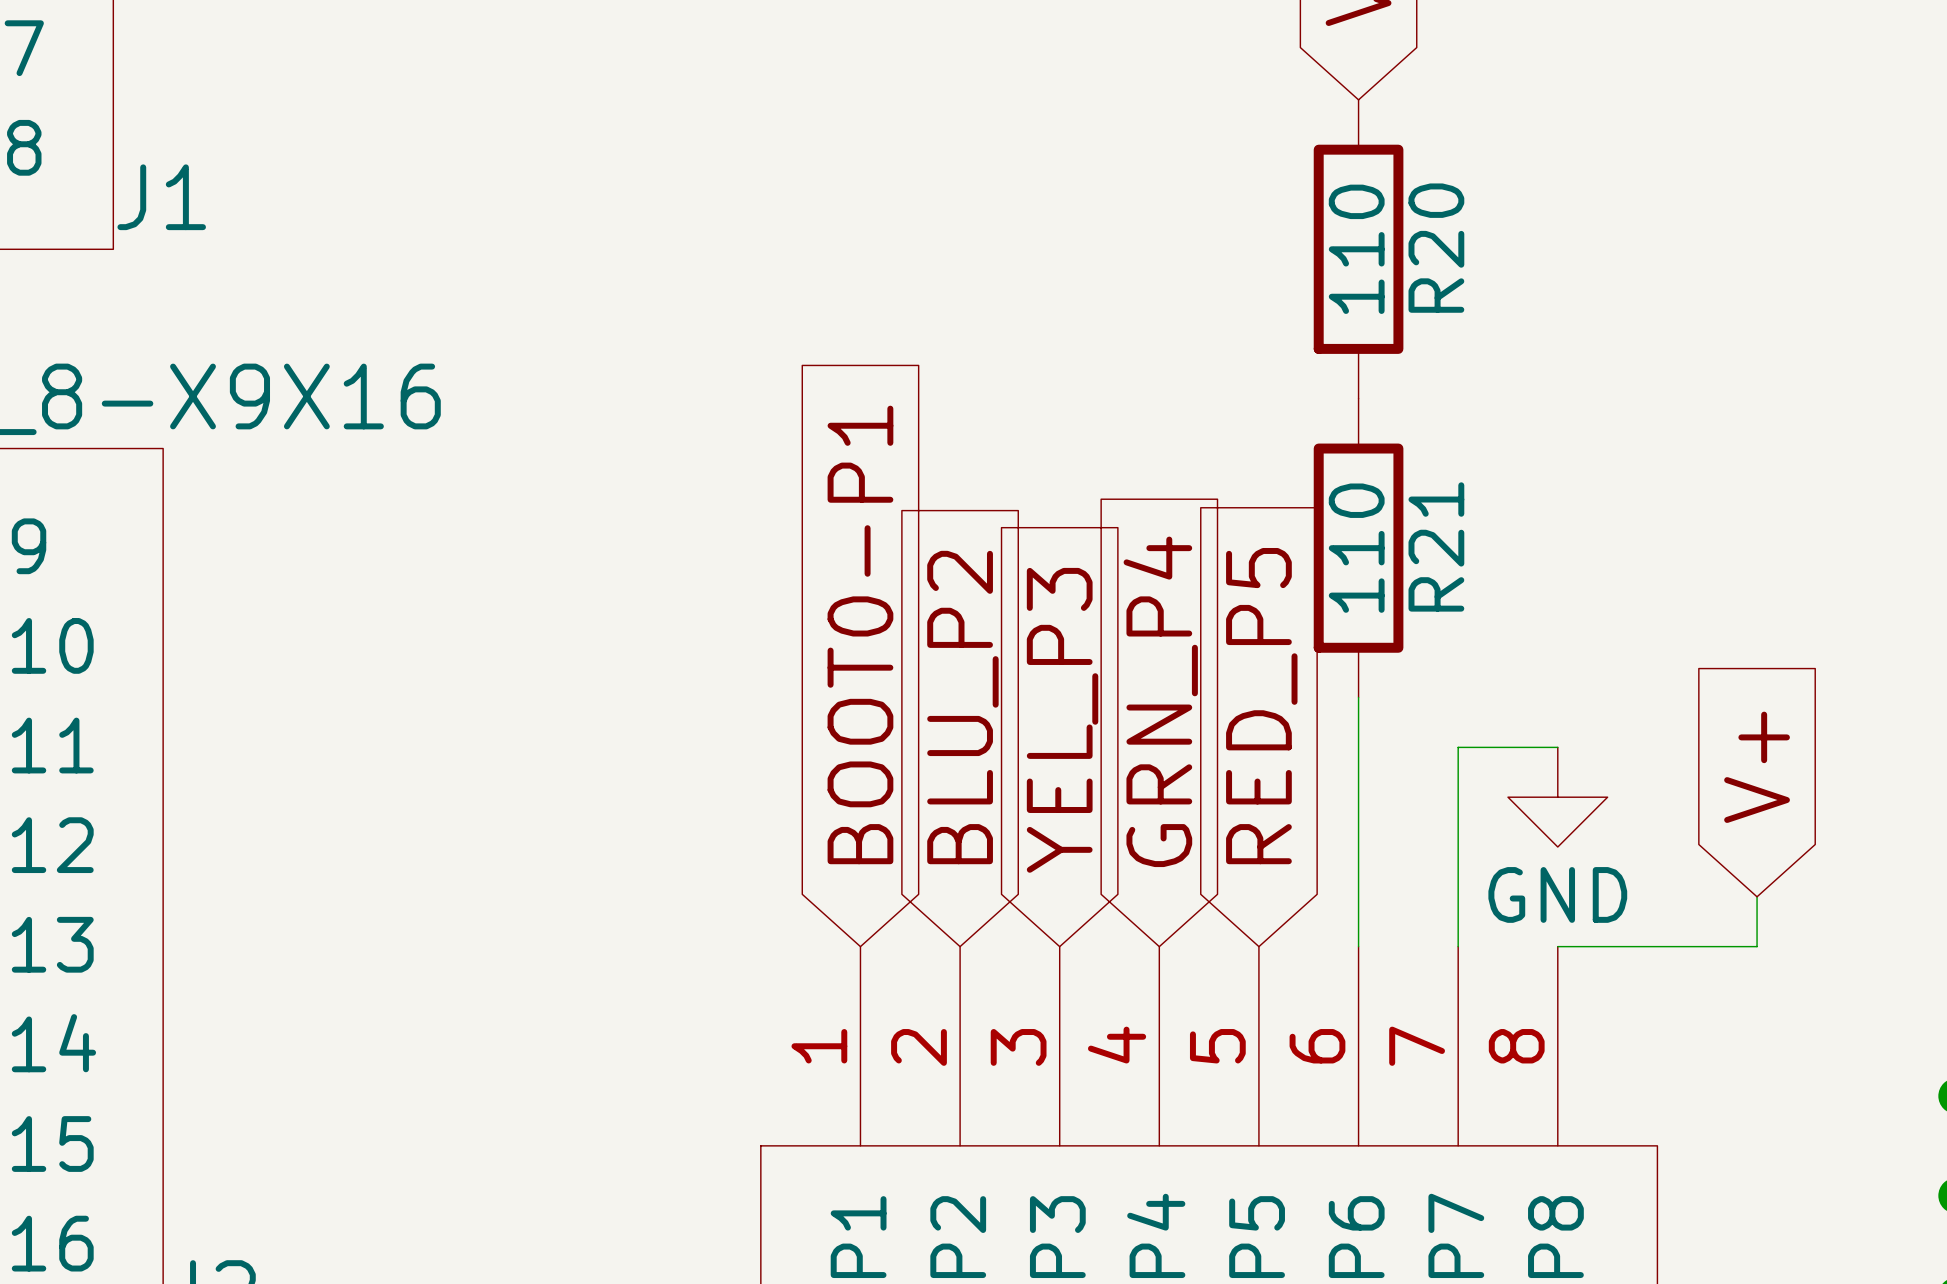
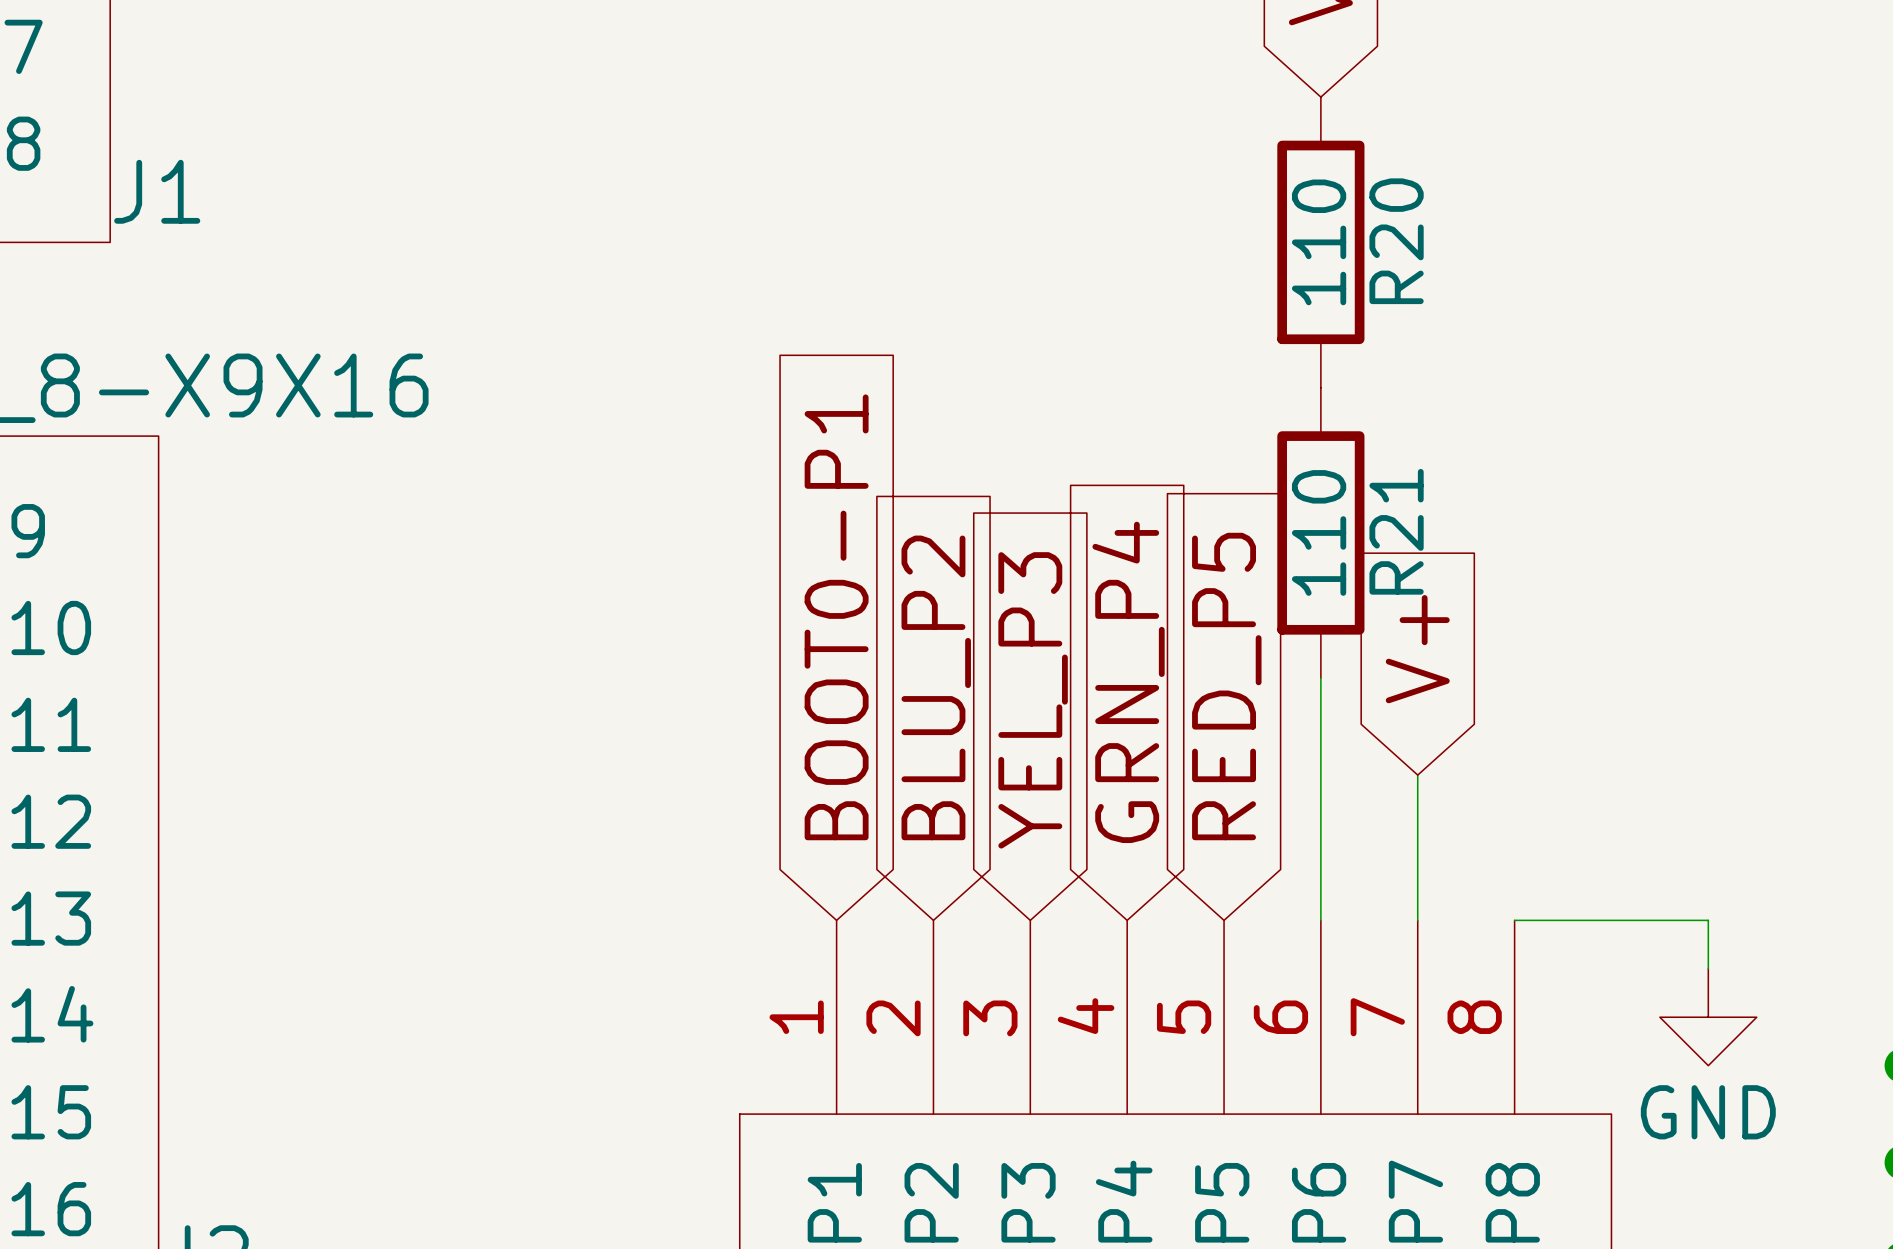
wire: (1557, 747) (1458, 747) (1458, 797) -> none
global label position: V+ (1757, 767) -> V+ (1417, 649)
power symbol position: GND (1557, 797) -> GND (1708, 1017)
wire: (1757, 896) (1757, 946) -> (1708, 968) (1708, 920)

